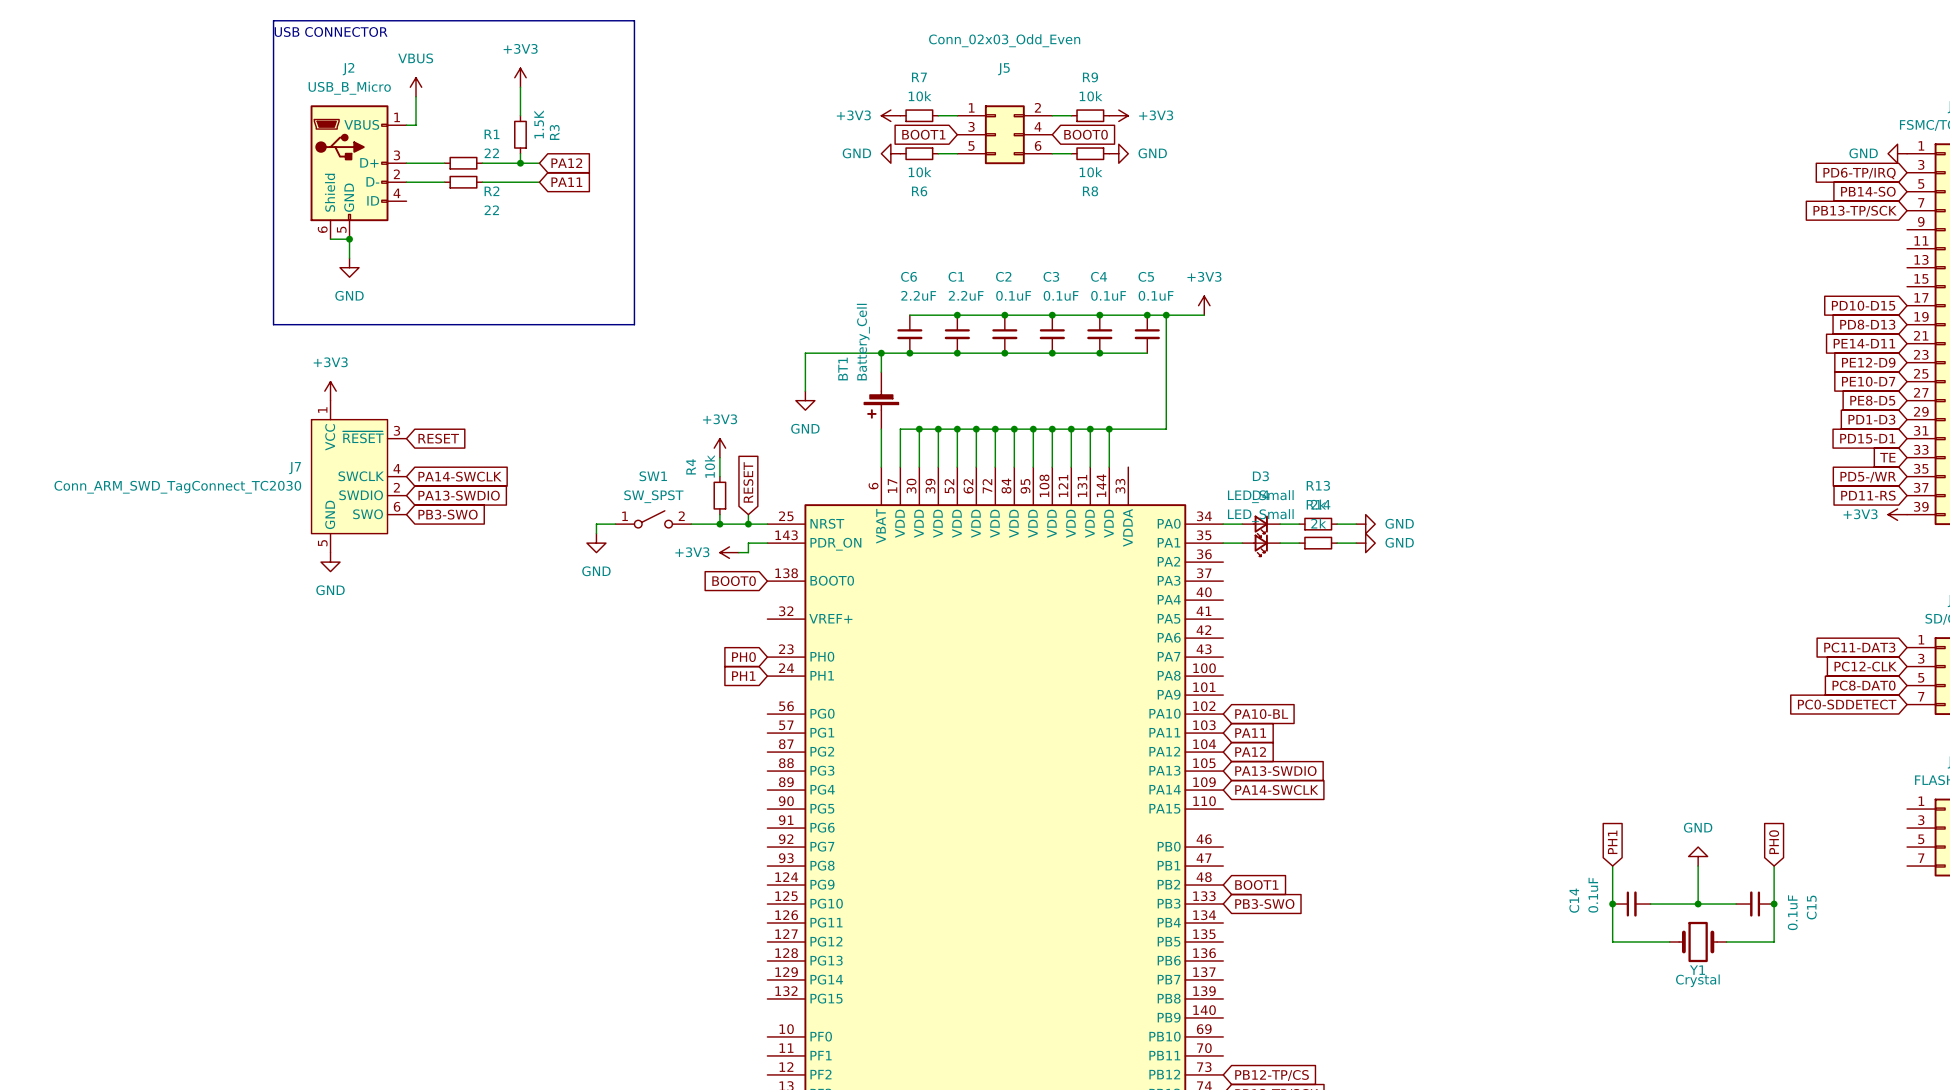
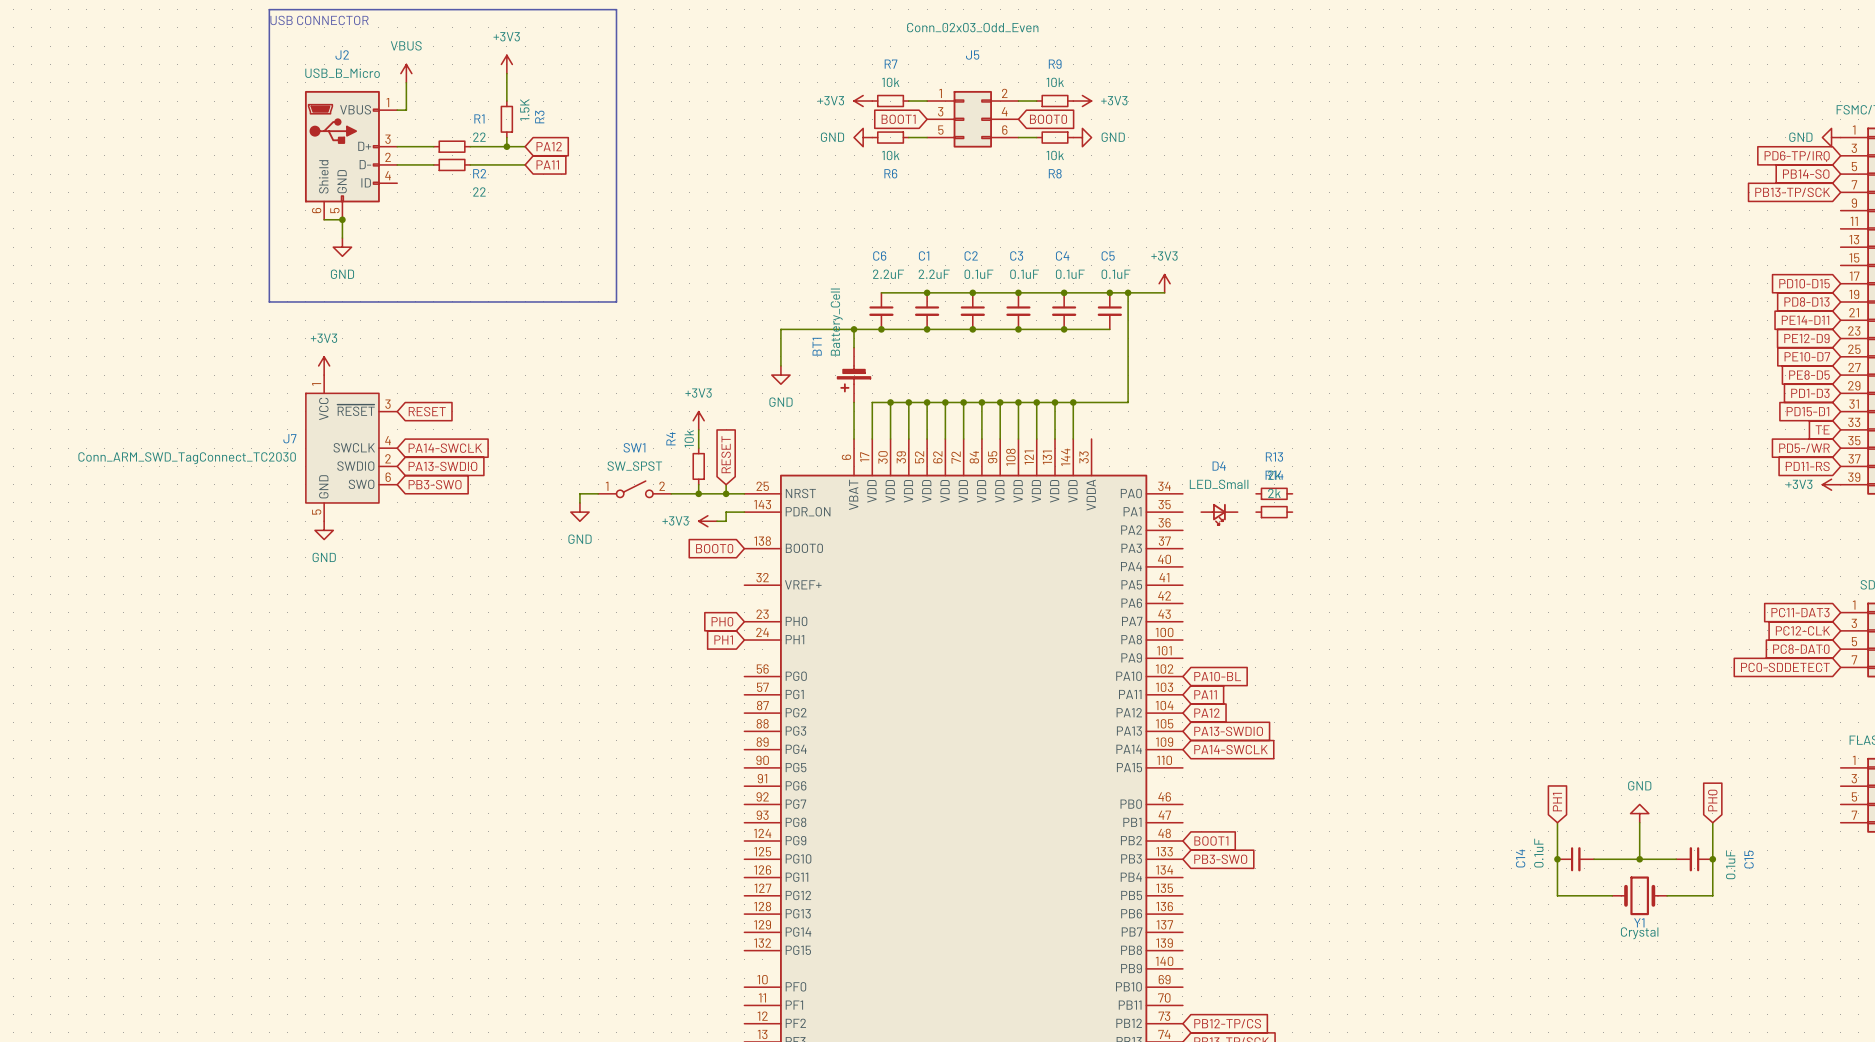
wire: (1223, 524) (1242, 524) -> none
wire: (1280, 524) (1299, 524) -> none
wire: (1337, 524) (1356, 524) -> none
power symbol: GND (1365, 524) -> none
D3: LED_Small (1261, 526) -> none
wire: (1223, 543) (1242, 543) -> none
wire: (1280, 543) (1299, 543) -> none
wire: (1337, 543) (1356, 543) -> none
power symbol: GND (1365, 543) -> none

